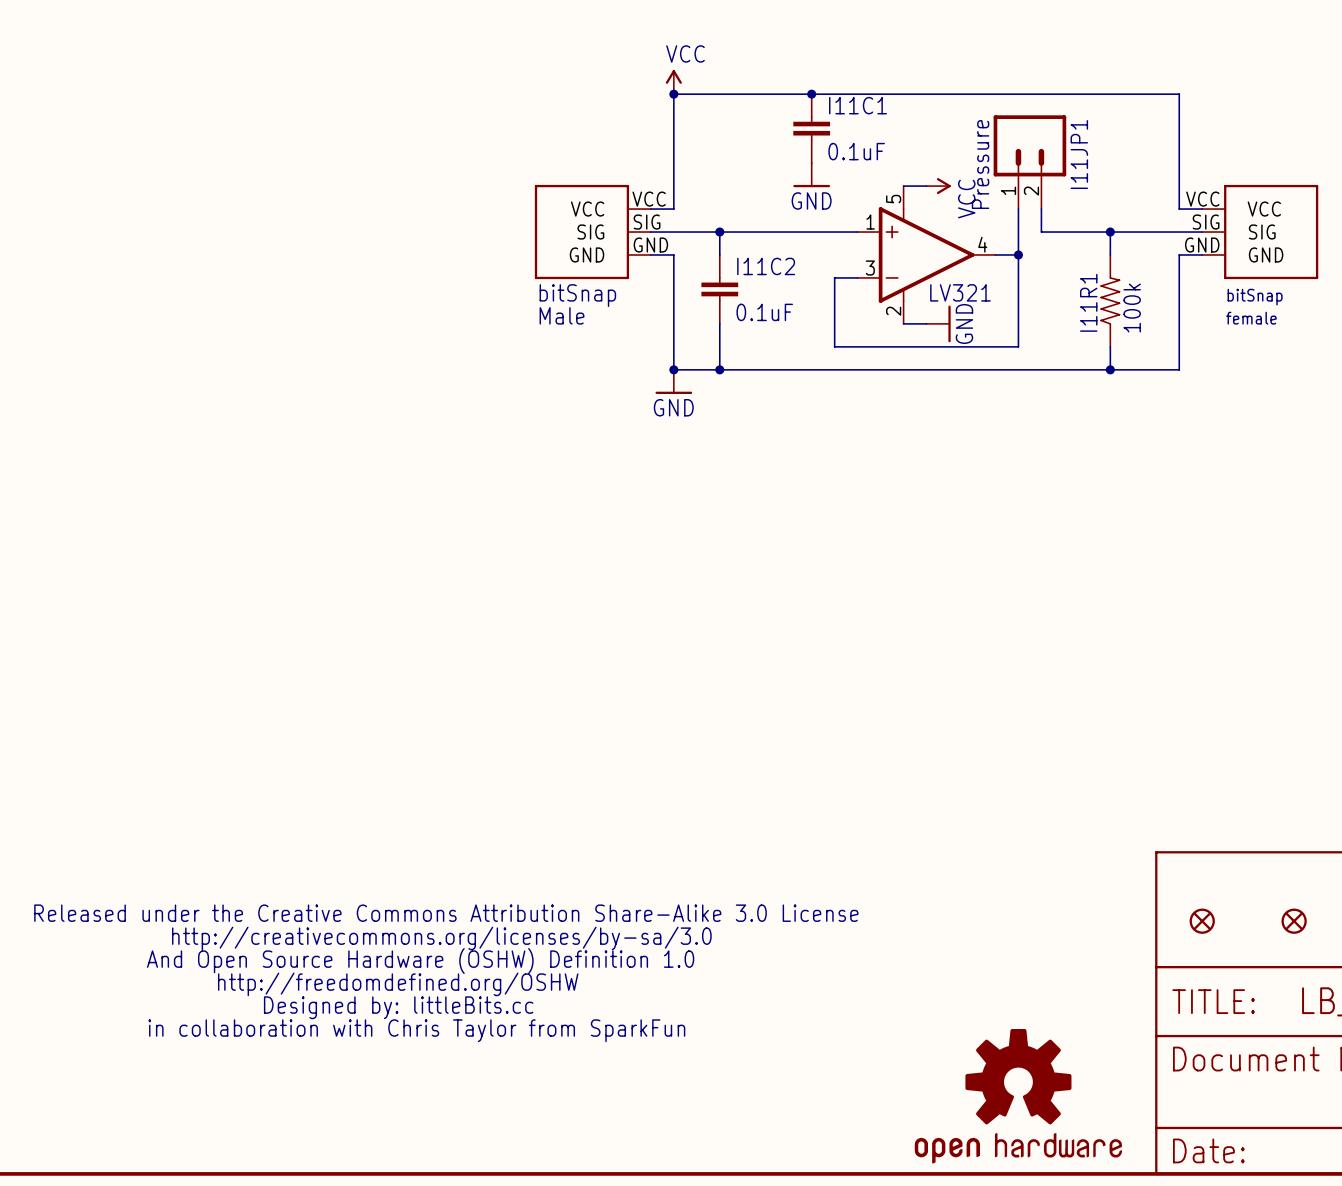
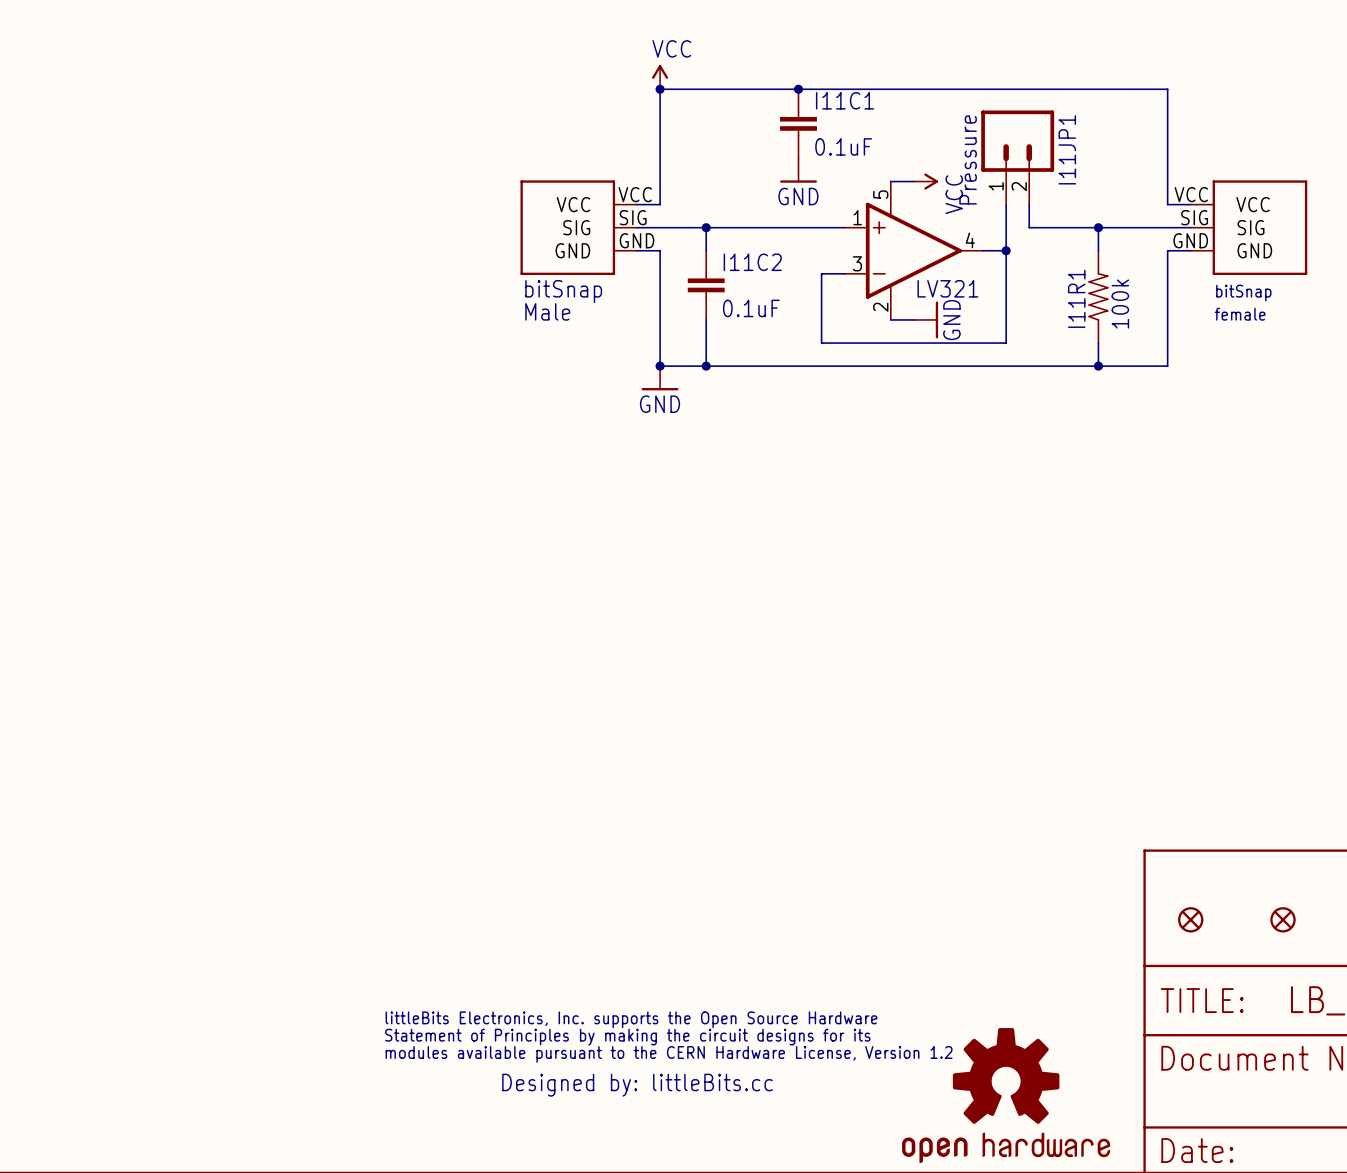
part: (446, 973) -> none
part: none -> (668, 1054)

